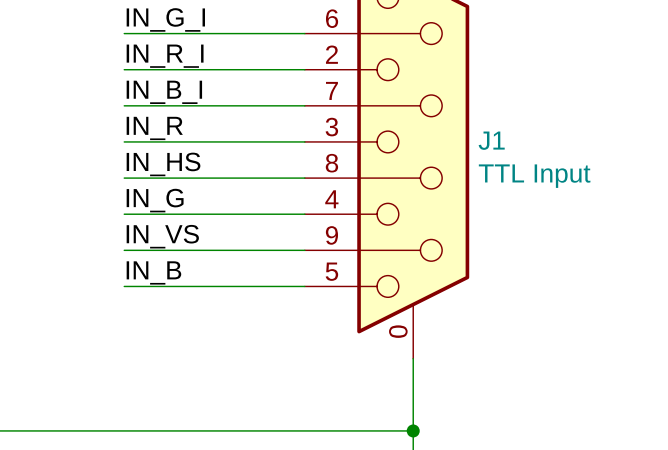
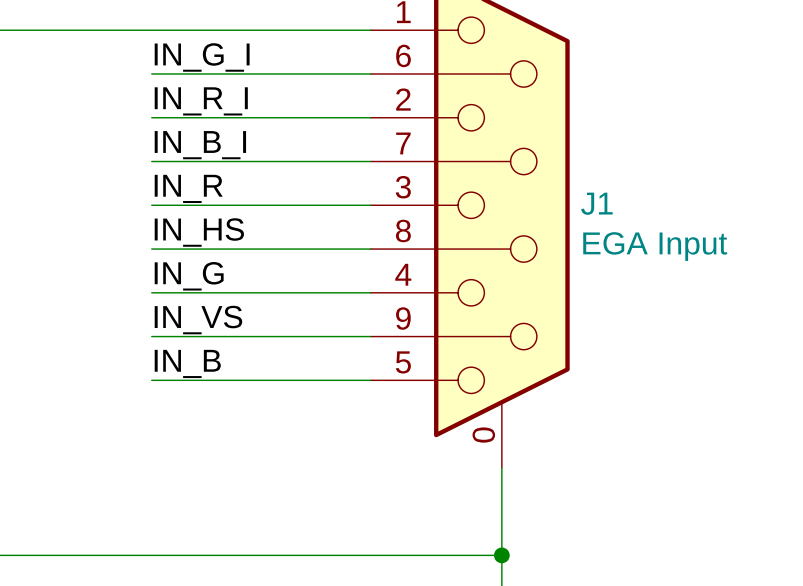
J1 value: TTL Input (534, 176) -> EGA Input (655, 246)

